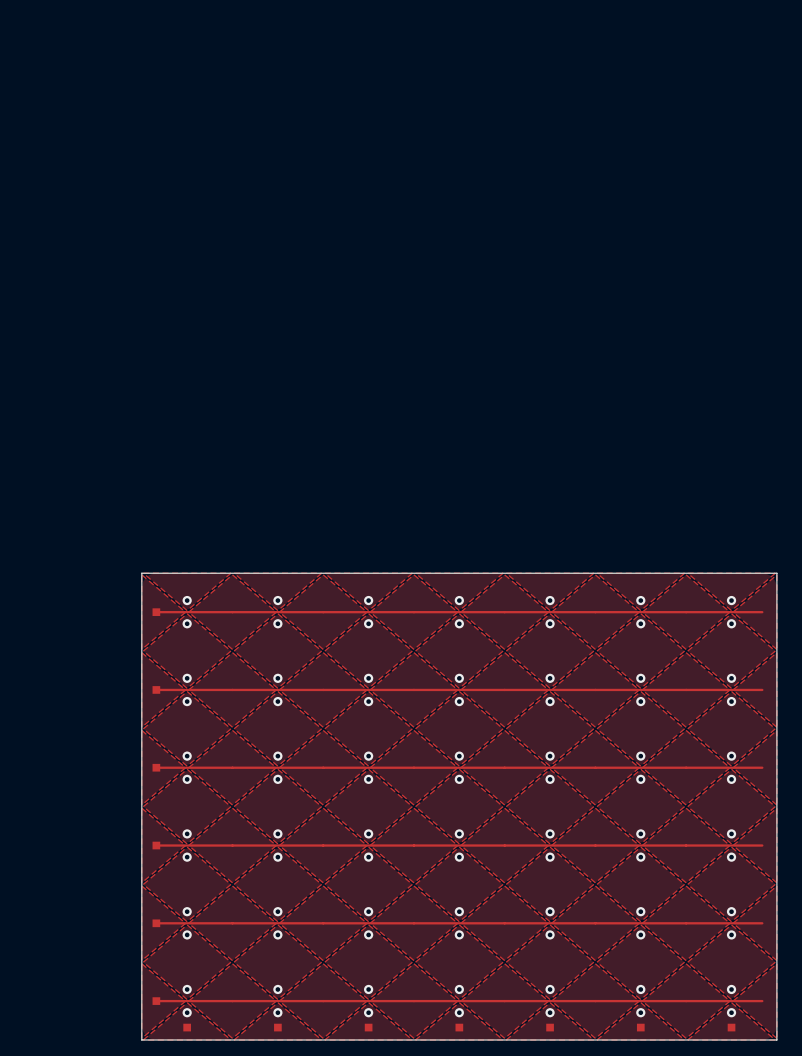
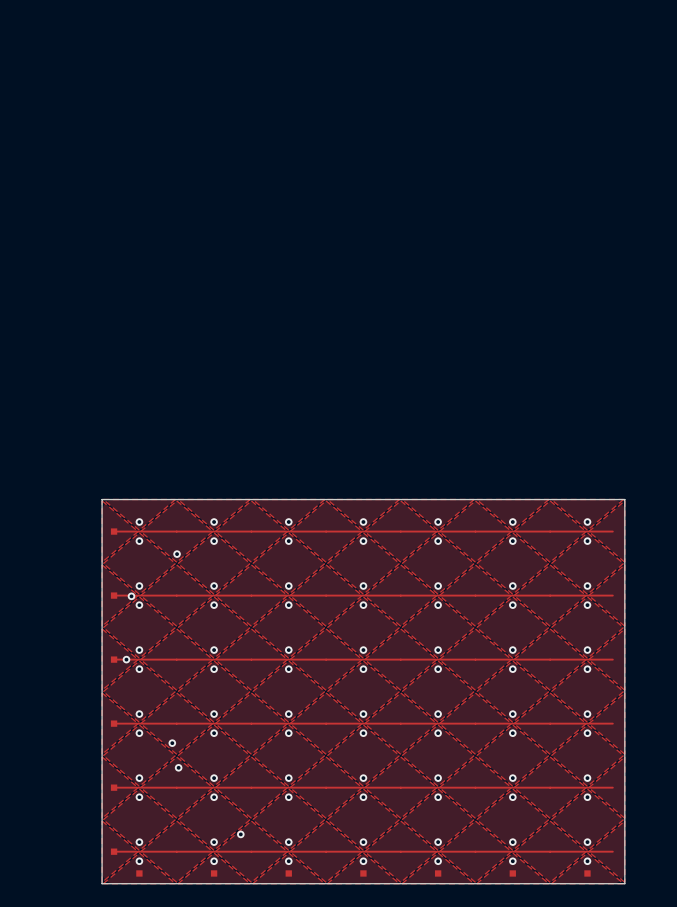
via: none -> (177, 554)
via: none -> (131, 596)
via: none -> (126, 659)
via: none -> (172, 743)
via: none -> (178, 767)
via: none -> (240, 834)

